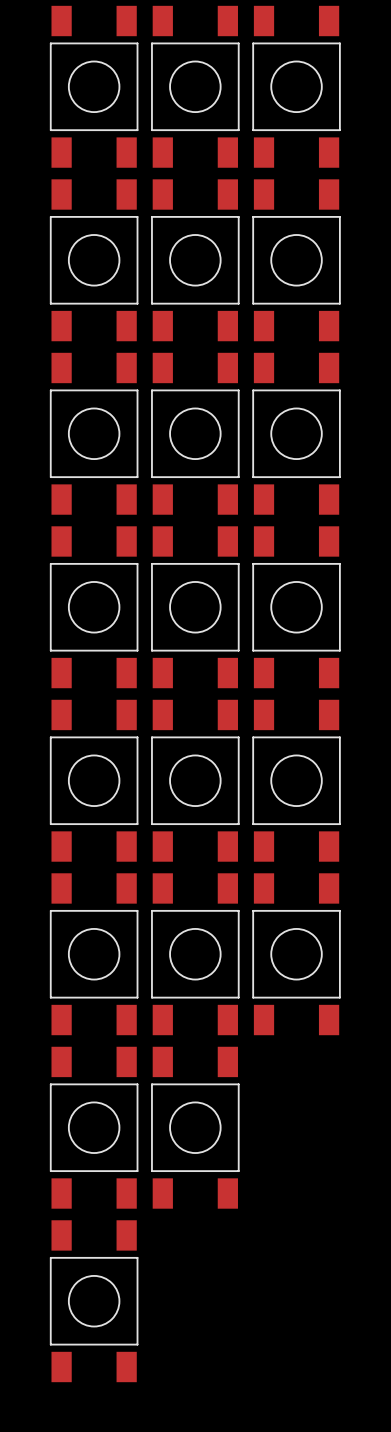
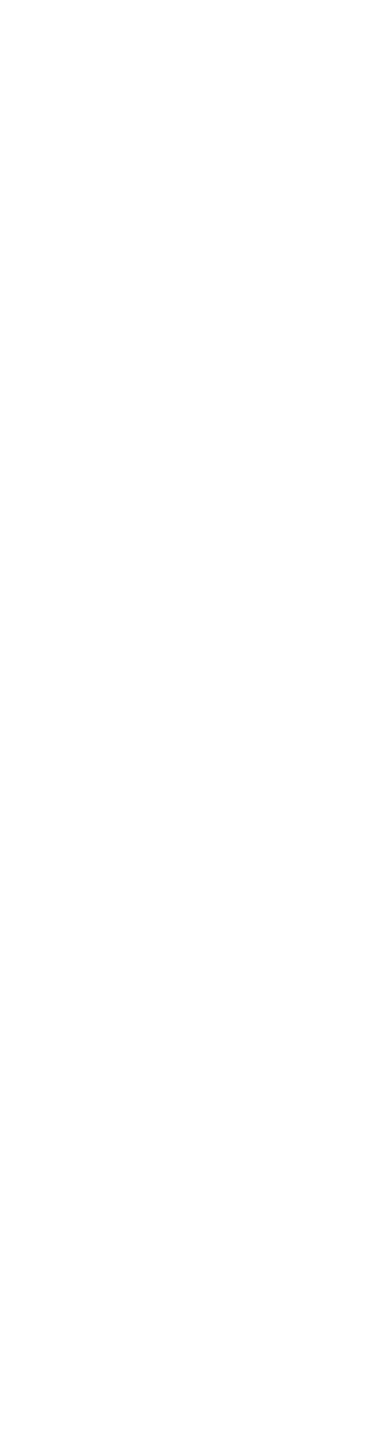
part: (94, 86) -> none
part: (195, 86) -> none
part: (296, 86) -> none
part: (94, 260) -> none
part: (195, 260) -> none
part: (296, 260) -> none
part: (94, 433) -> none
part: (195, 433) -> none
part: (296, 433) -> none
part: (94, 607) -> none
part: (195, 607) -> none
part: (296, 607) -> none
part: (94, 780) -> none
part: (195, 780) -> none
part: (296, 780) -> none
part: (94, 954) -> none
part: (195, 954) -> none
part: (296, 954) -> none
part: (94, 1127) -> none
part: (195, 1127) -> none
part: (94, 1301) -> none

